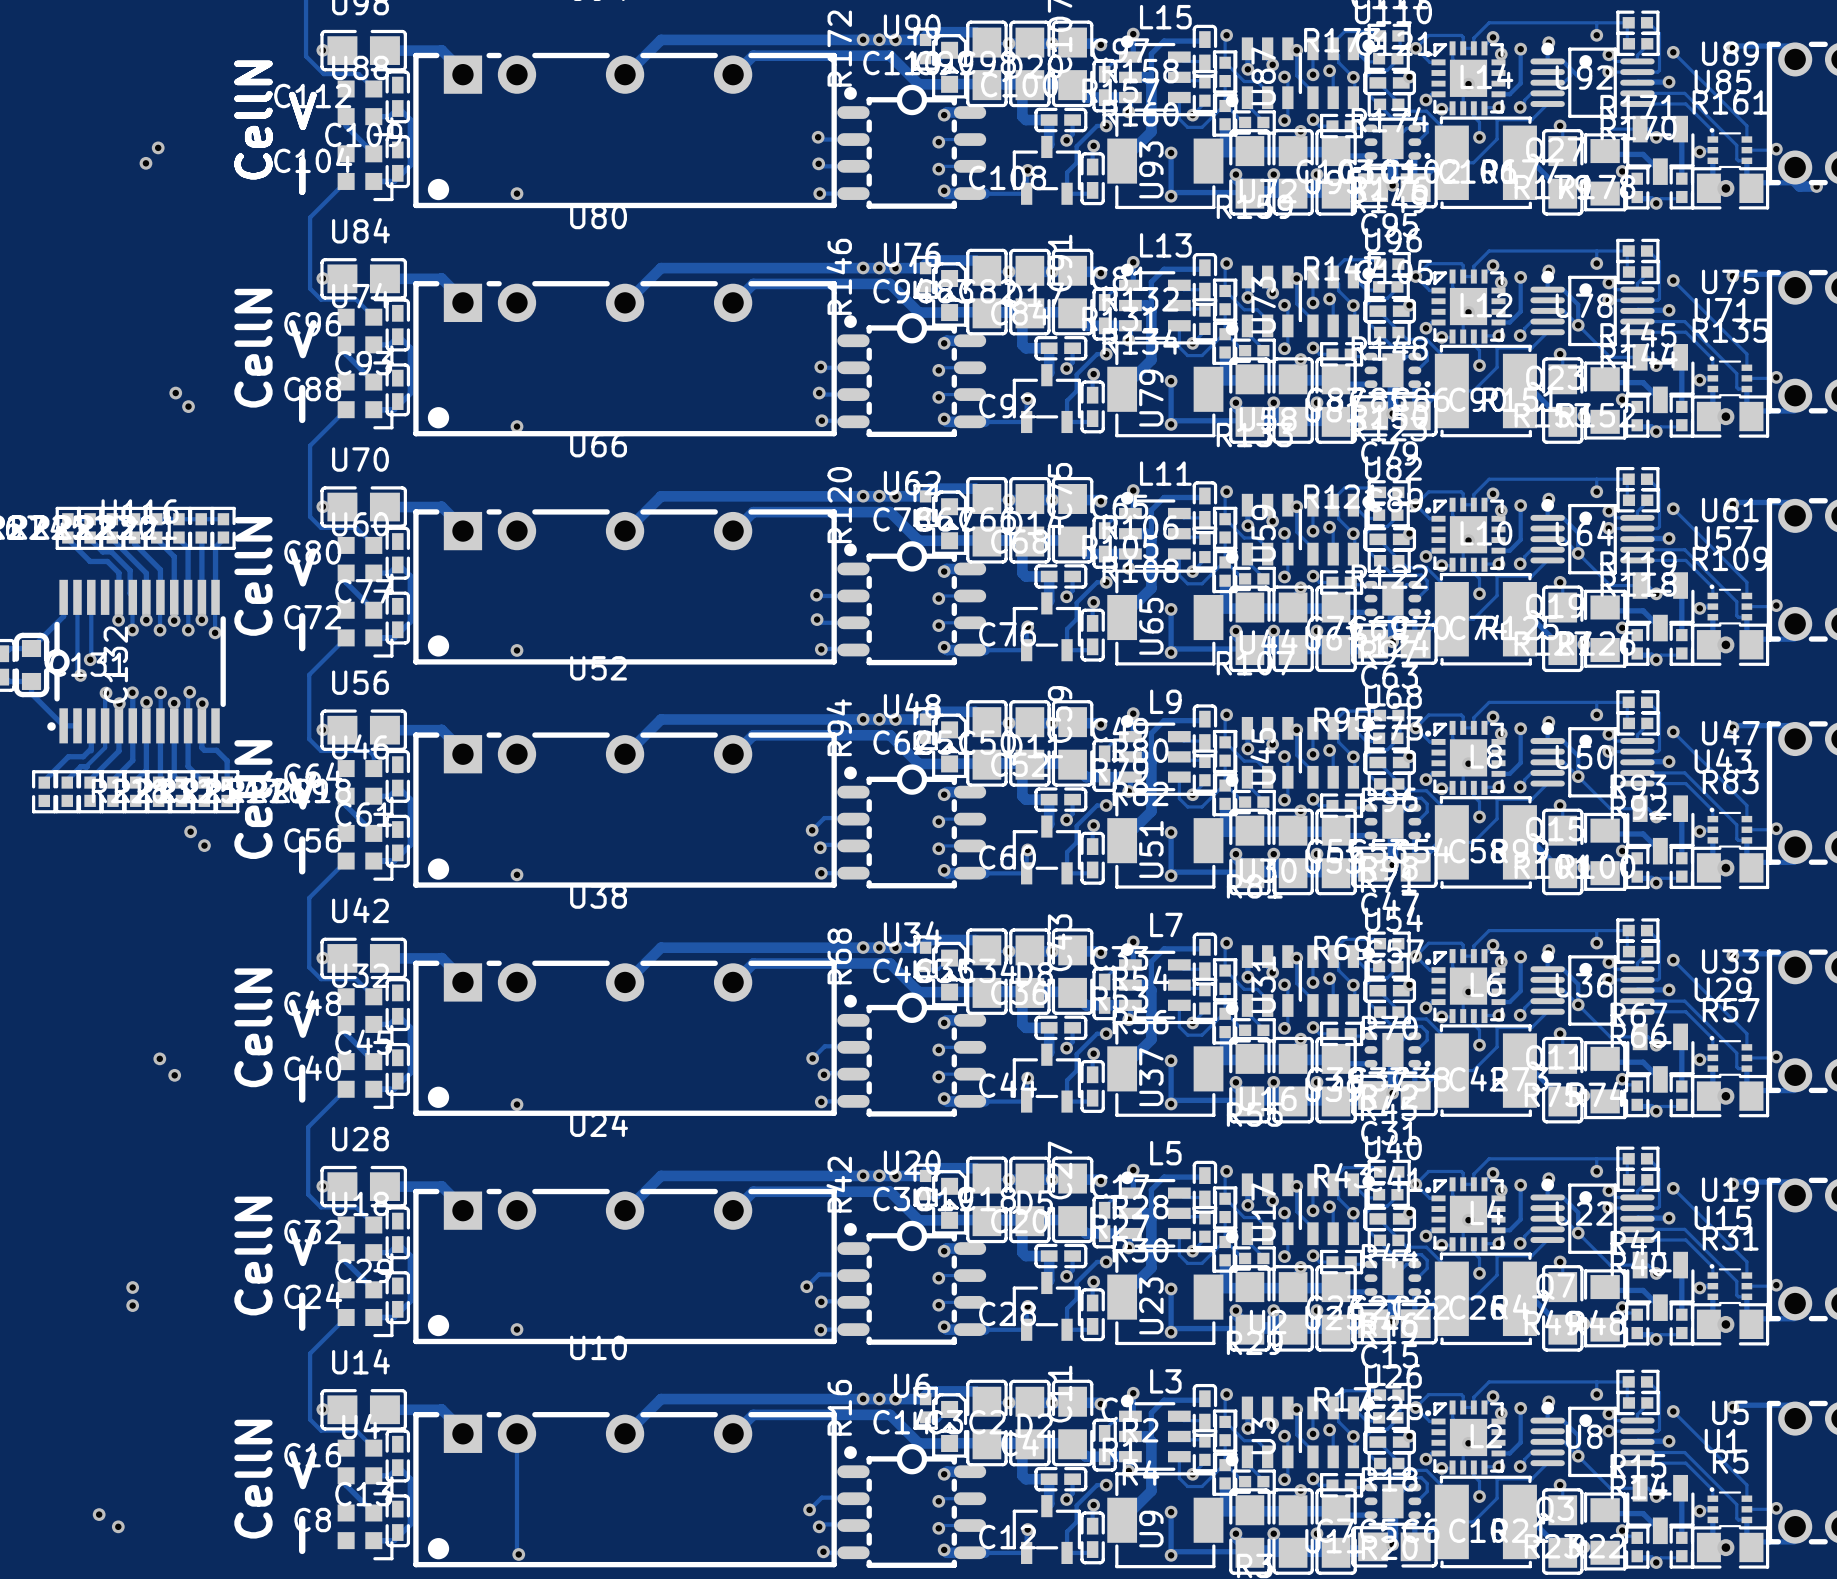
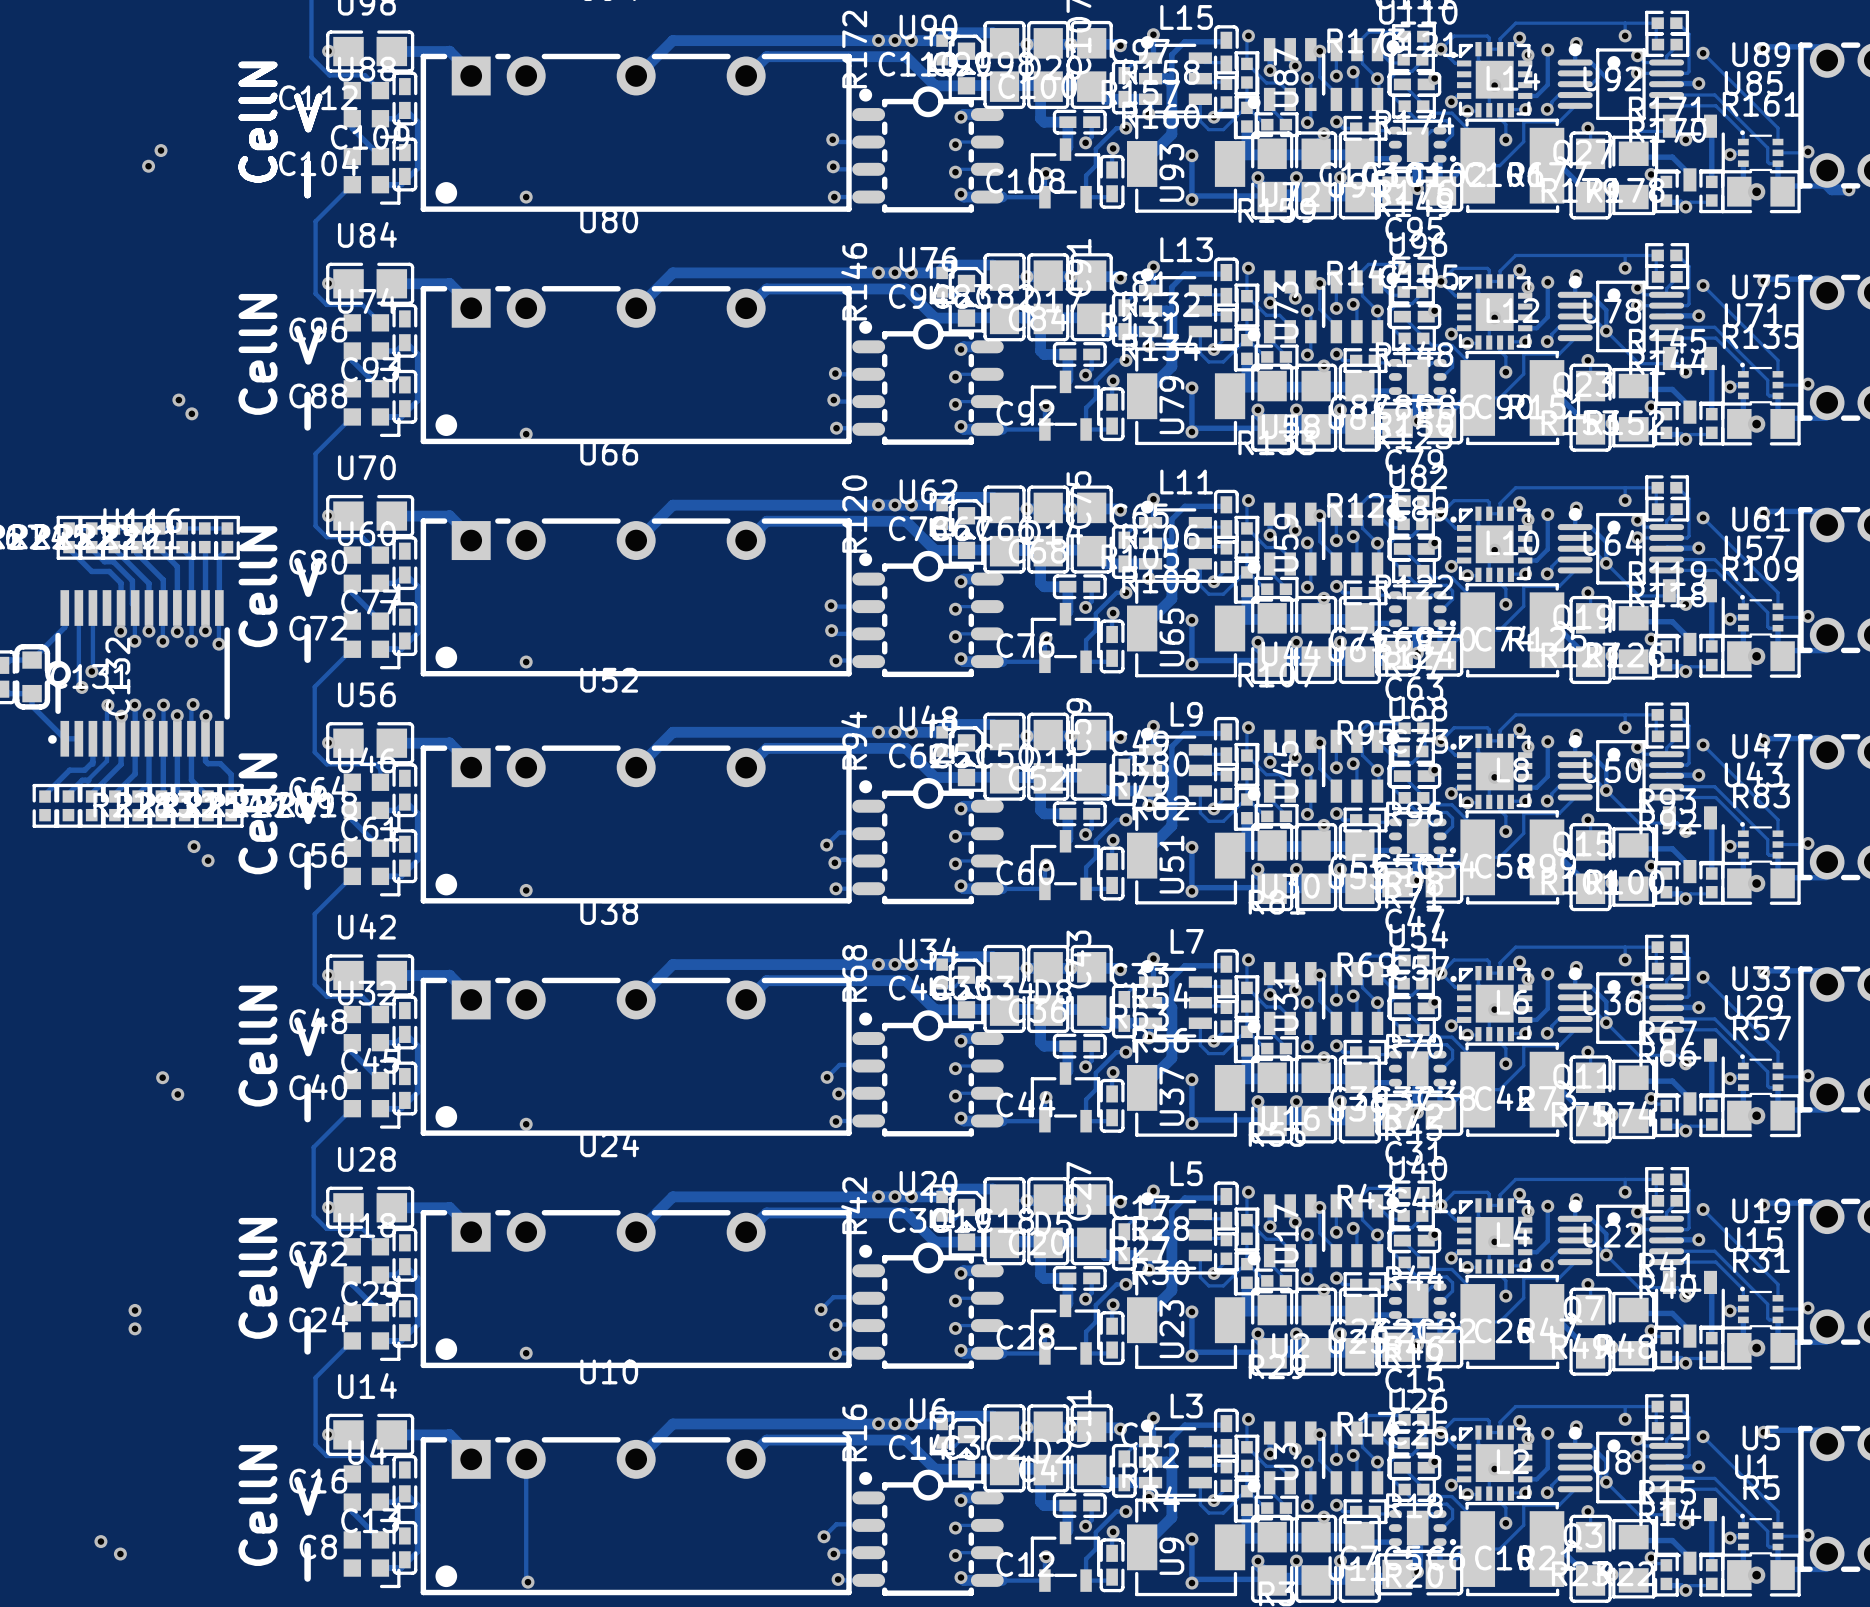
part footprint: [1626, 115, 1695, 185] -> [1654, 114, 1725, 192]
part footprint: [1626, 344, 1695, 414] -> [1654, 346, 1725, 424]
part footprint: [1626, 572, 1695, 642] -> [1654, 579, 1725, 657]
part footprint: [1626, 795, 1695, 865] -> [1654, 806, 1725, 884]
part footprint: [1626, 1023, 1695, 1093] -> [1654, 1038, 1725, 1116]
part footprint: [1626, 1251, 1695, 1321] -> [1654, 1270, 1725, 1348]
part footprint: [1626, 1474, 1695, 1545] -> [1654, 1497, 1725, 1575]

